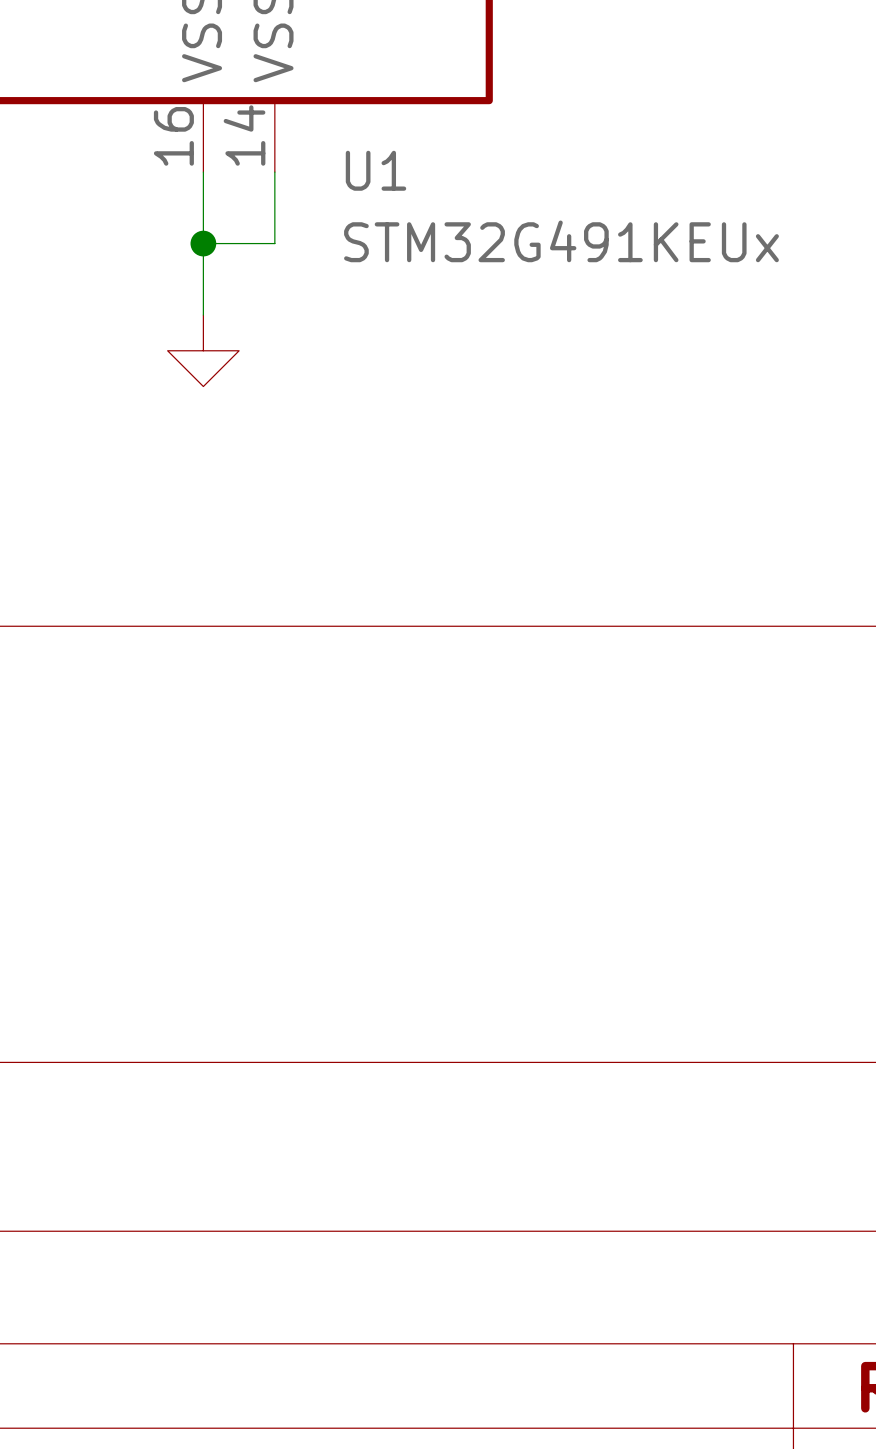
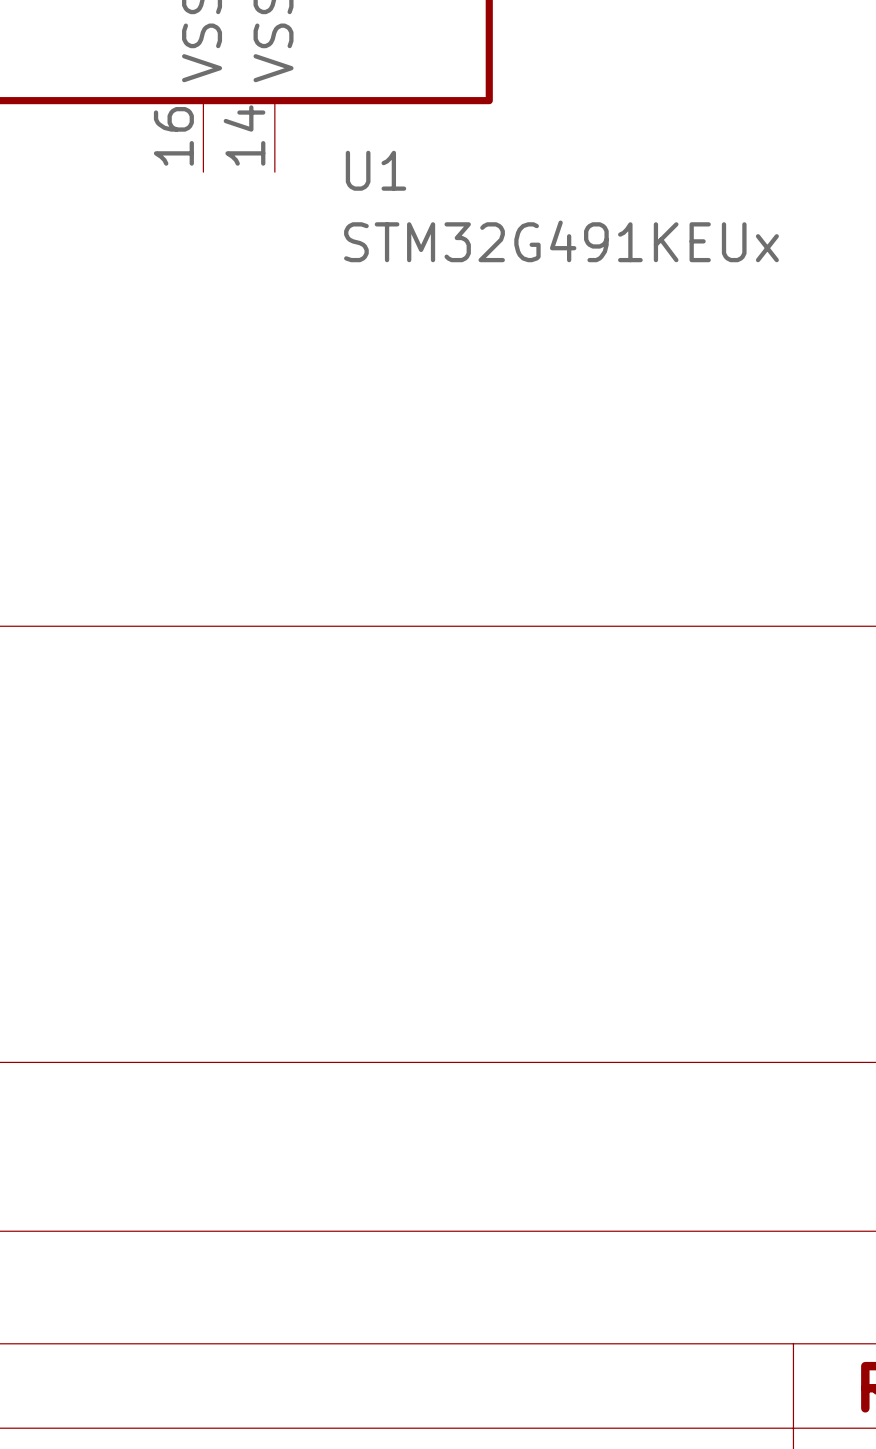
wire: (203, 172) (203, 315) -> none
wire: (274, 172) (274, 243) (203, 243) -> none
junction: (203, 243) -> none
power symbol: (203, 350) -> none

